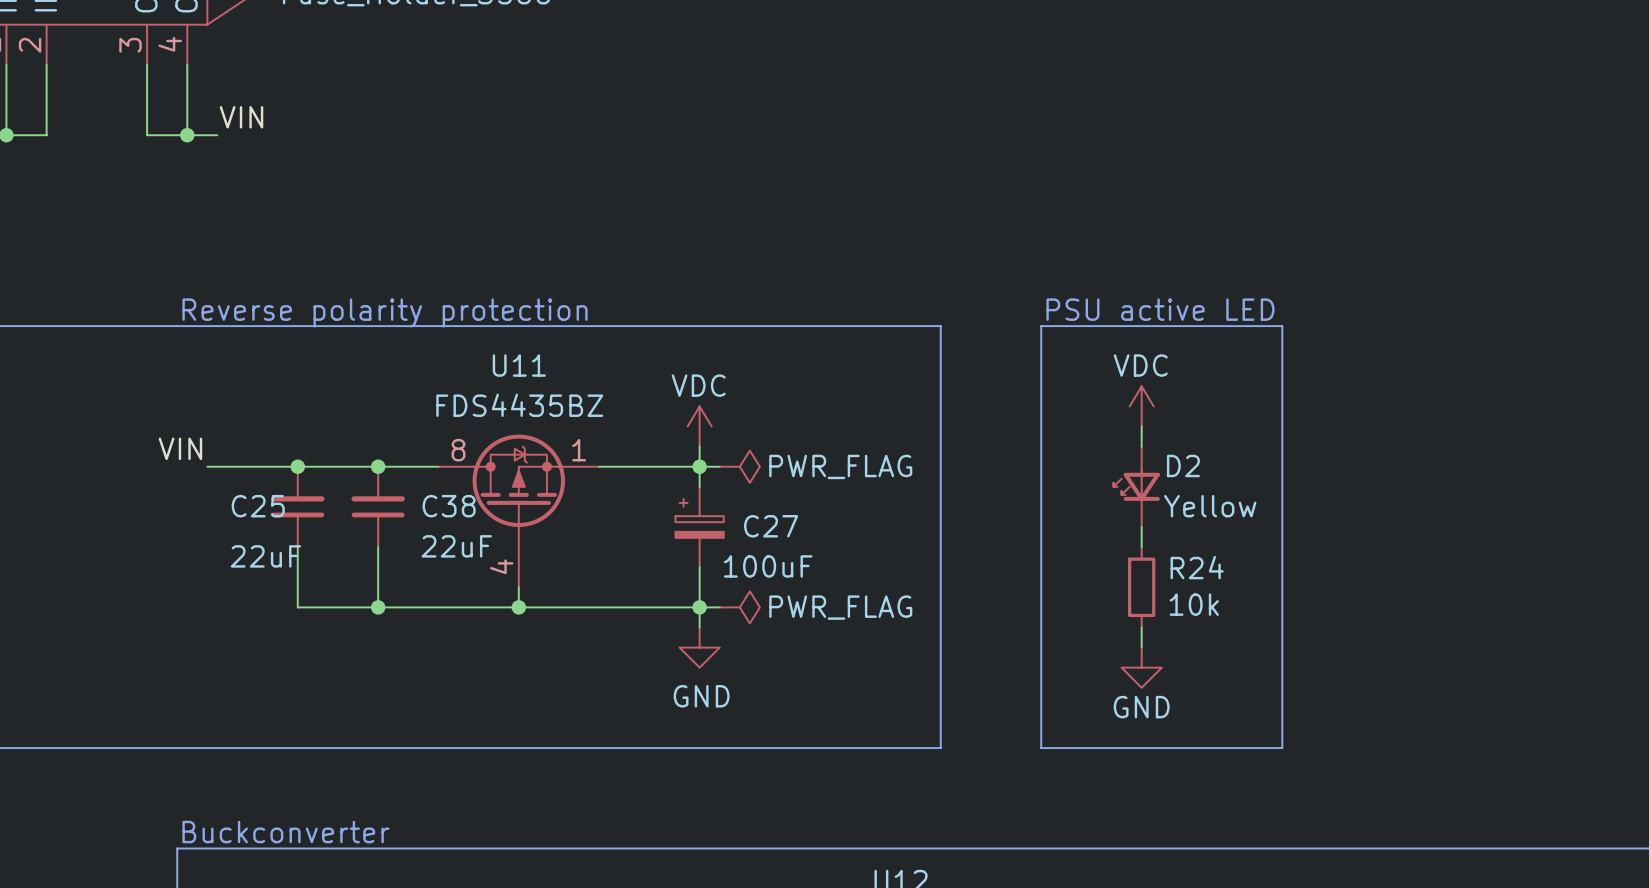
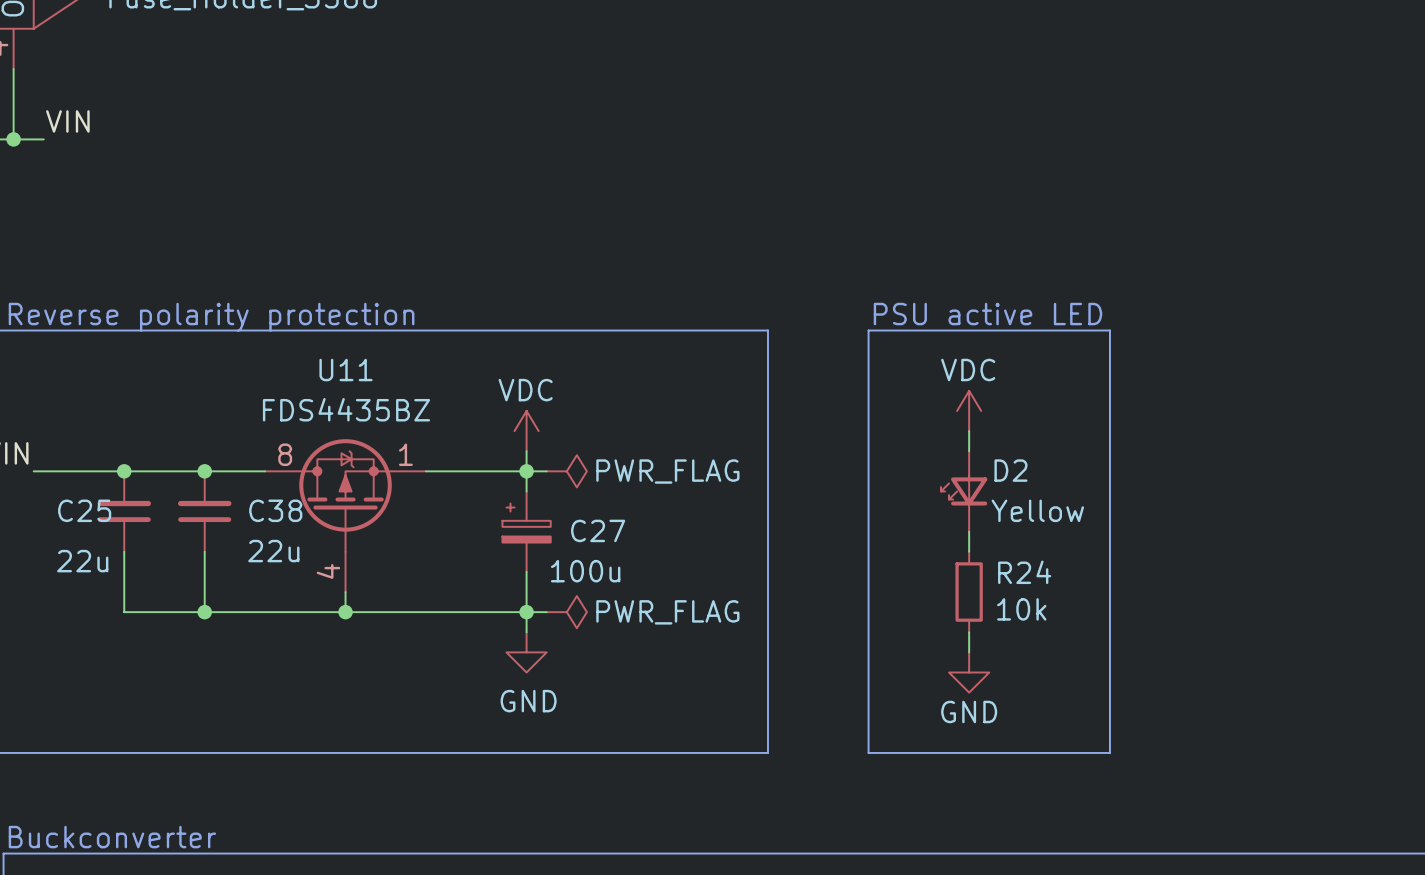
C38 value: 22uF (456, 546) -> 22u (273, 551)
C25 value: 22uF (265, 556) -> 22u (82, 561)
C27 value: 100uF (768, 566) -> 100u (585, 571)

